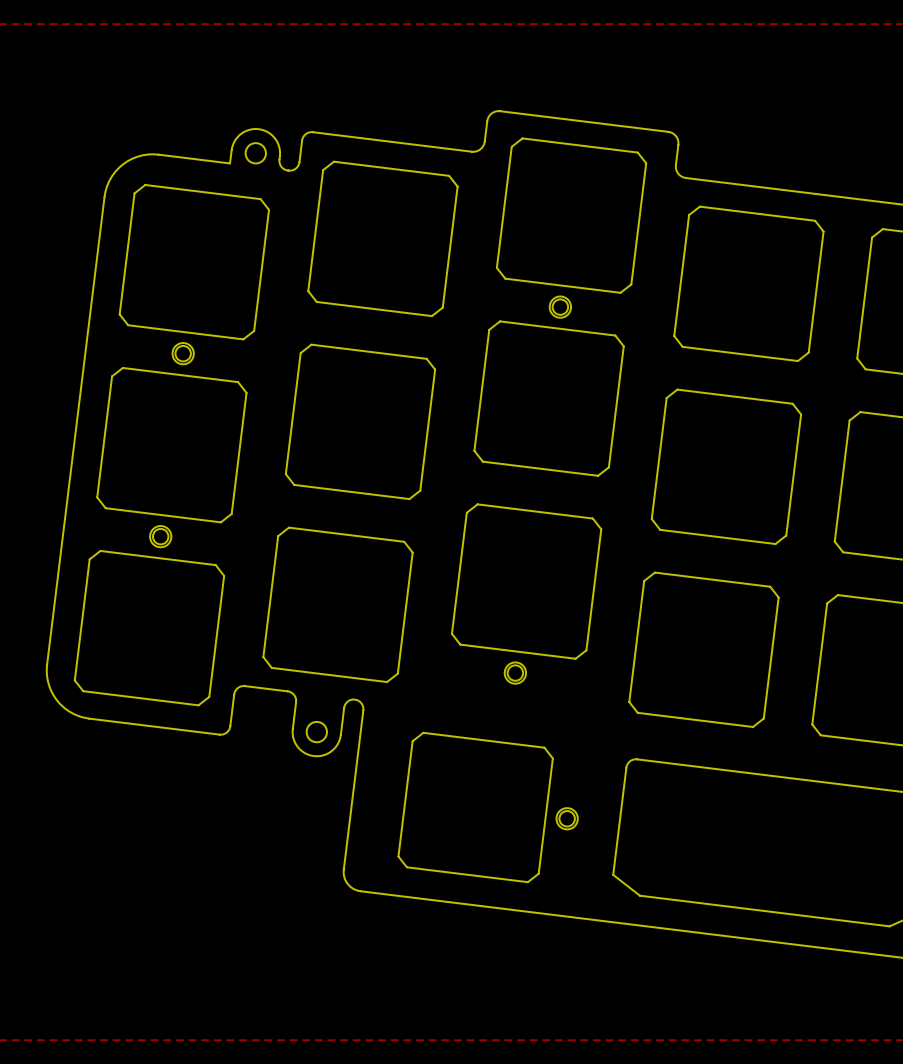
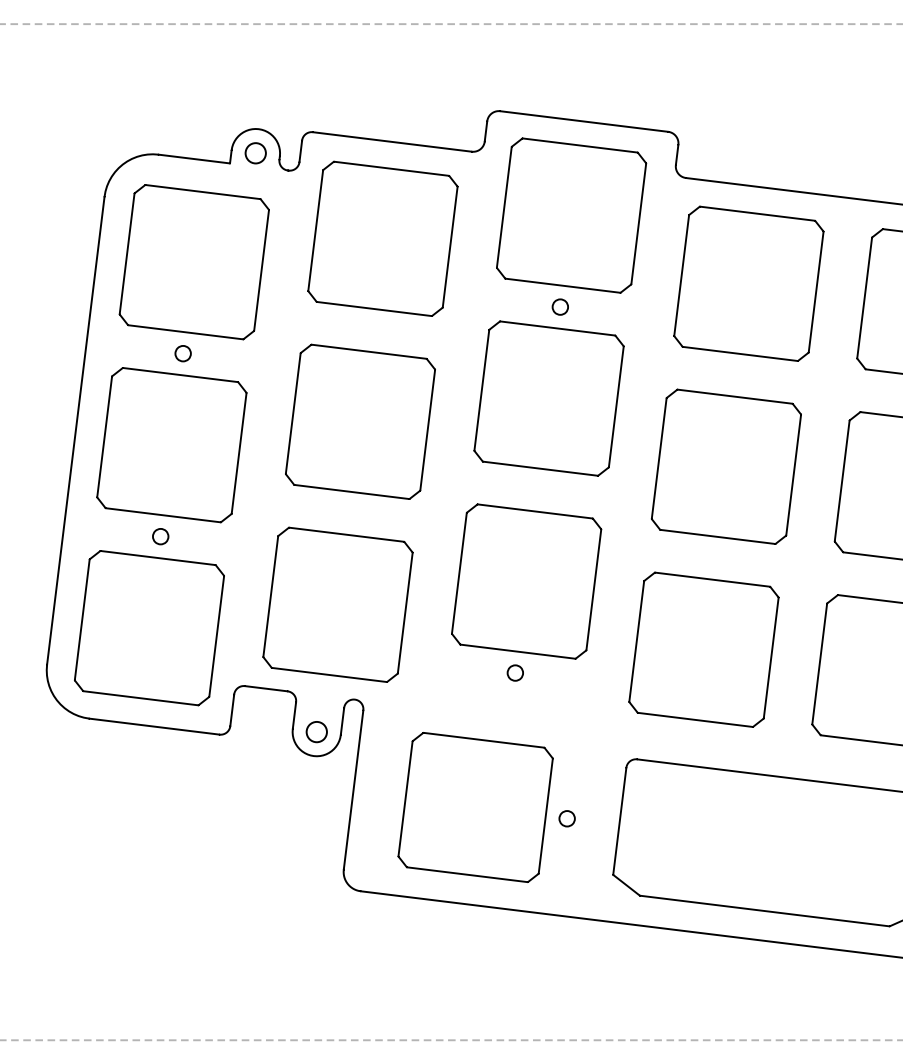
drawing: none -> [552, 299, 569, 316]
part: (560, 307) -> none
drawing: none -> [175, 345, 192, 362]
part: (183, 353) -> none
drawing: none -> [152, 528, 169, 545]
part: (160, 536) -> none
drawing: none -> [507, 665, 524, 682]
part: (515, 673) -> none
drawing: none -> [559, 810, 576, 827]
part: (567, 818) -> none

